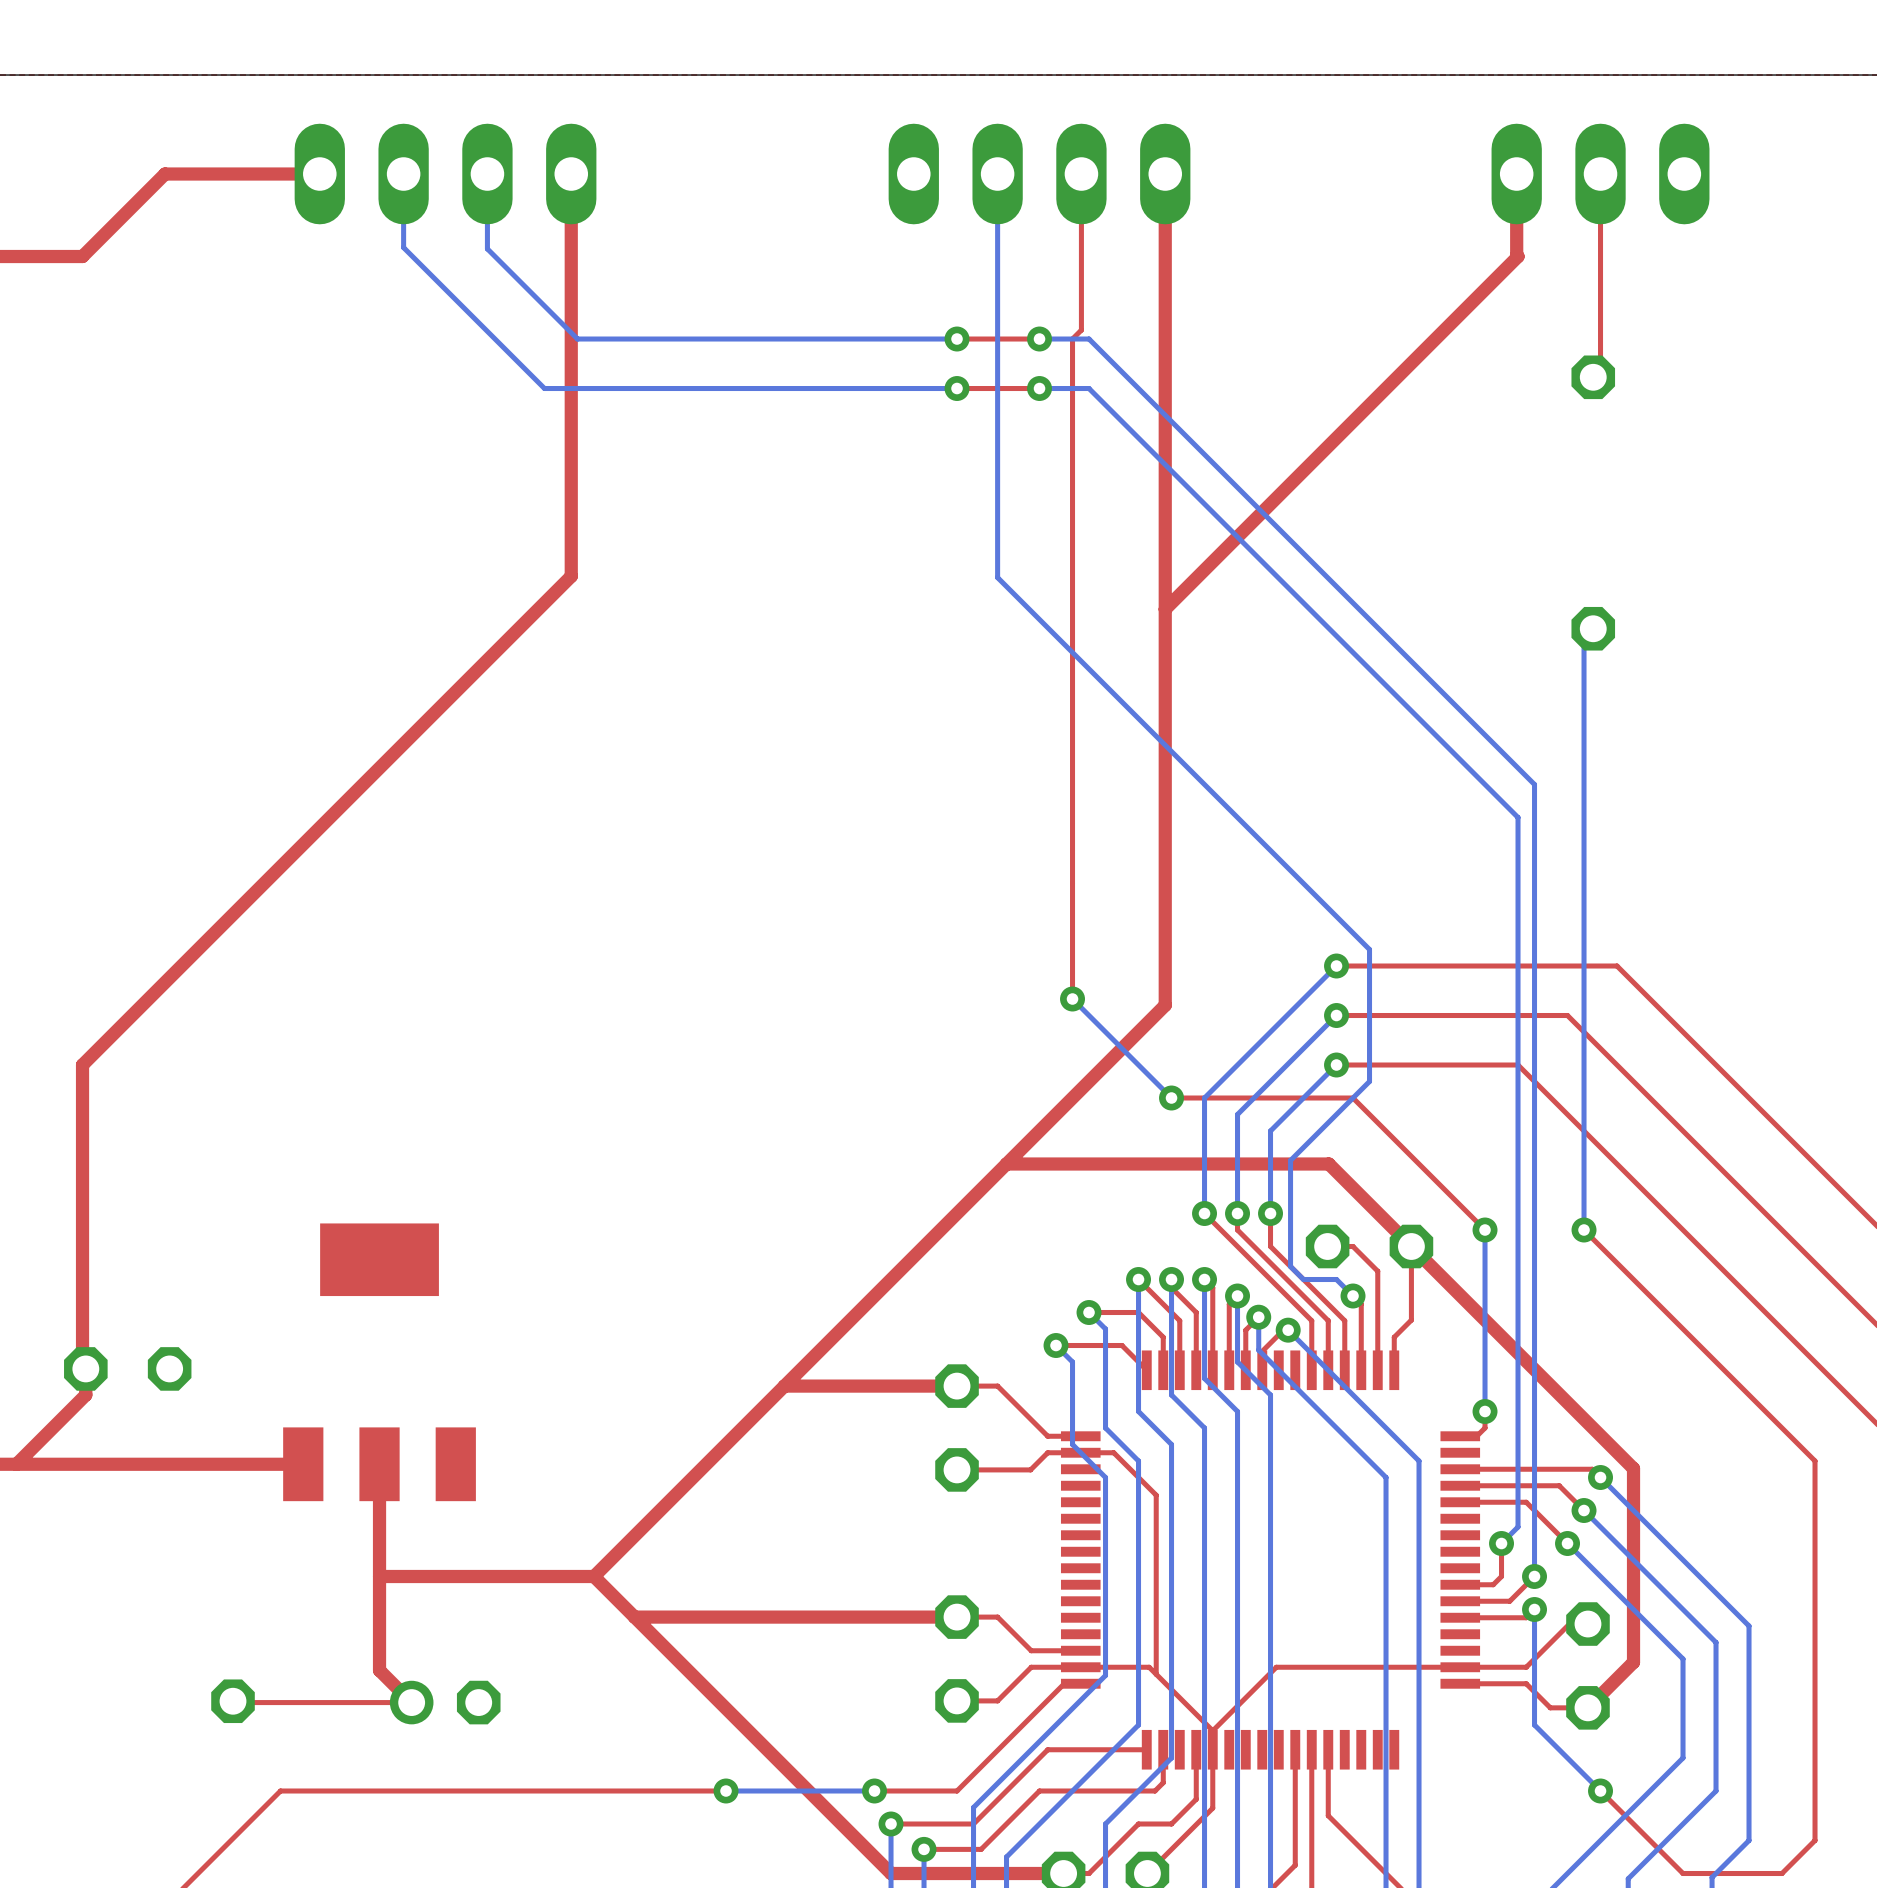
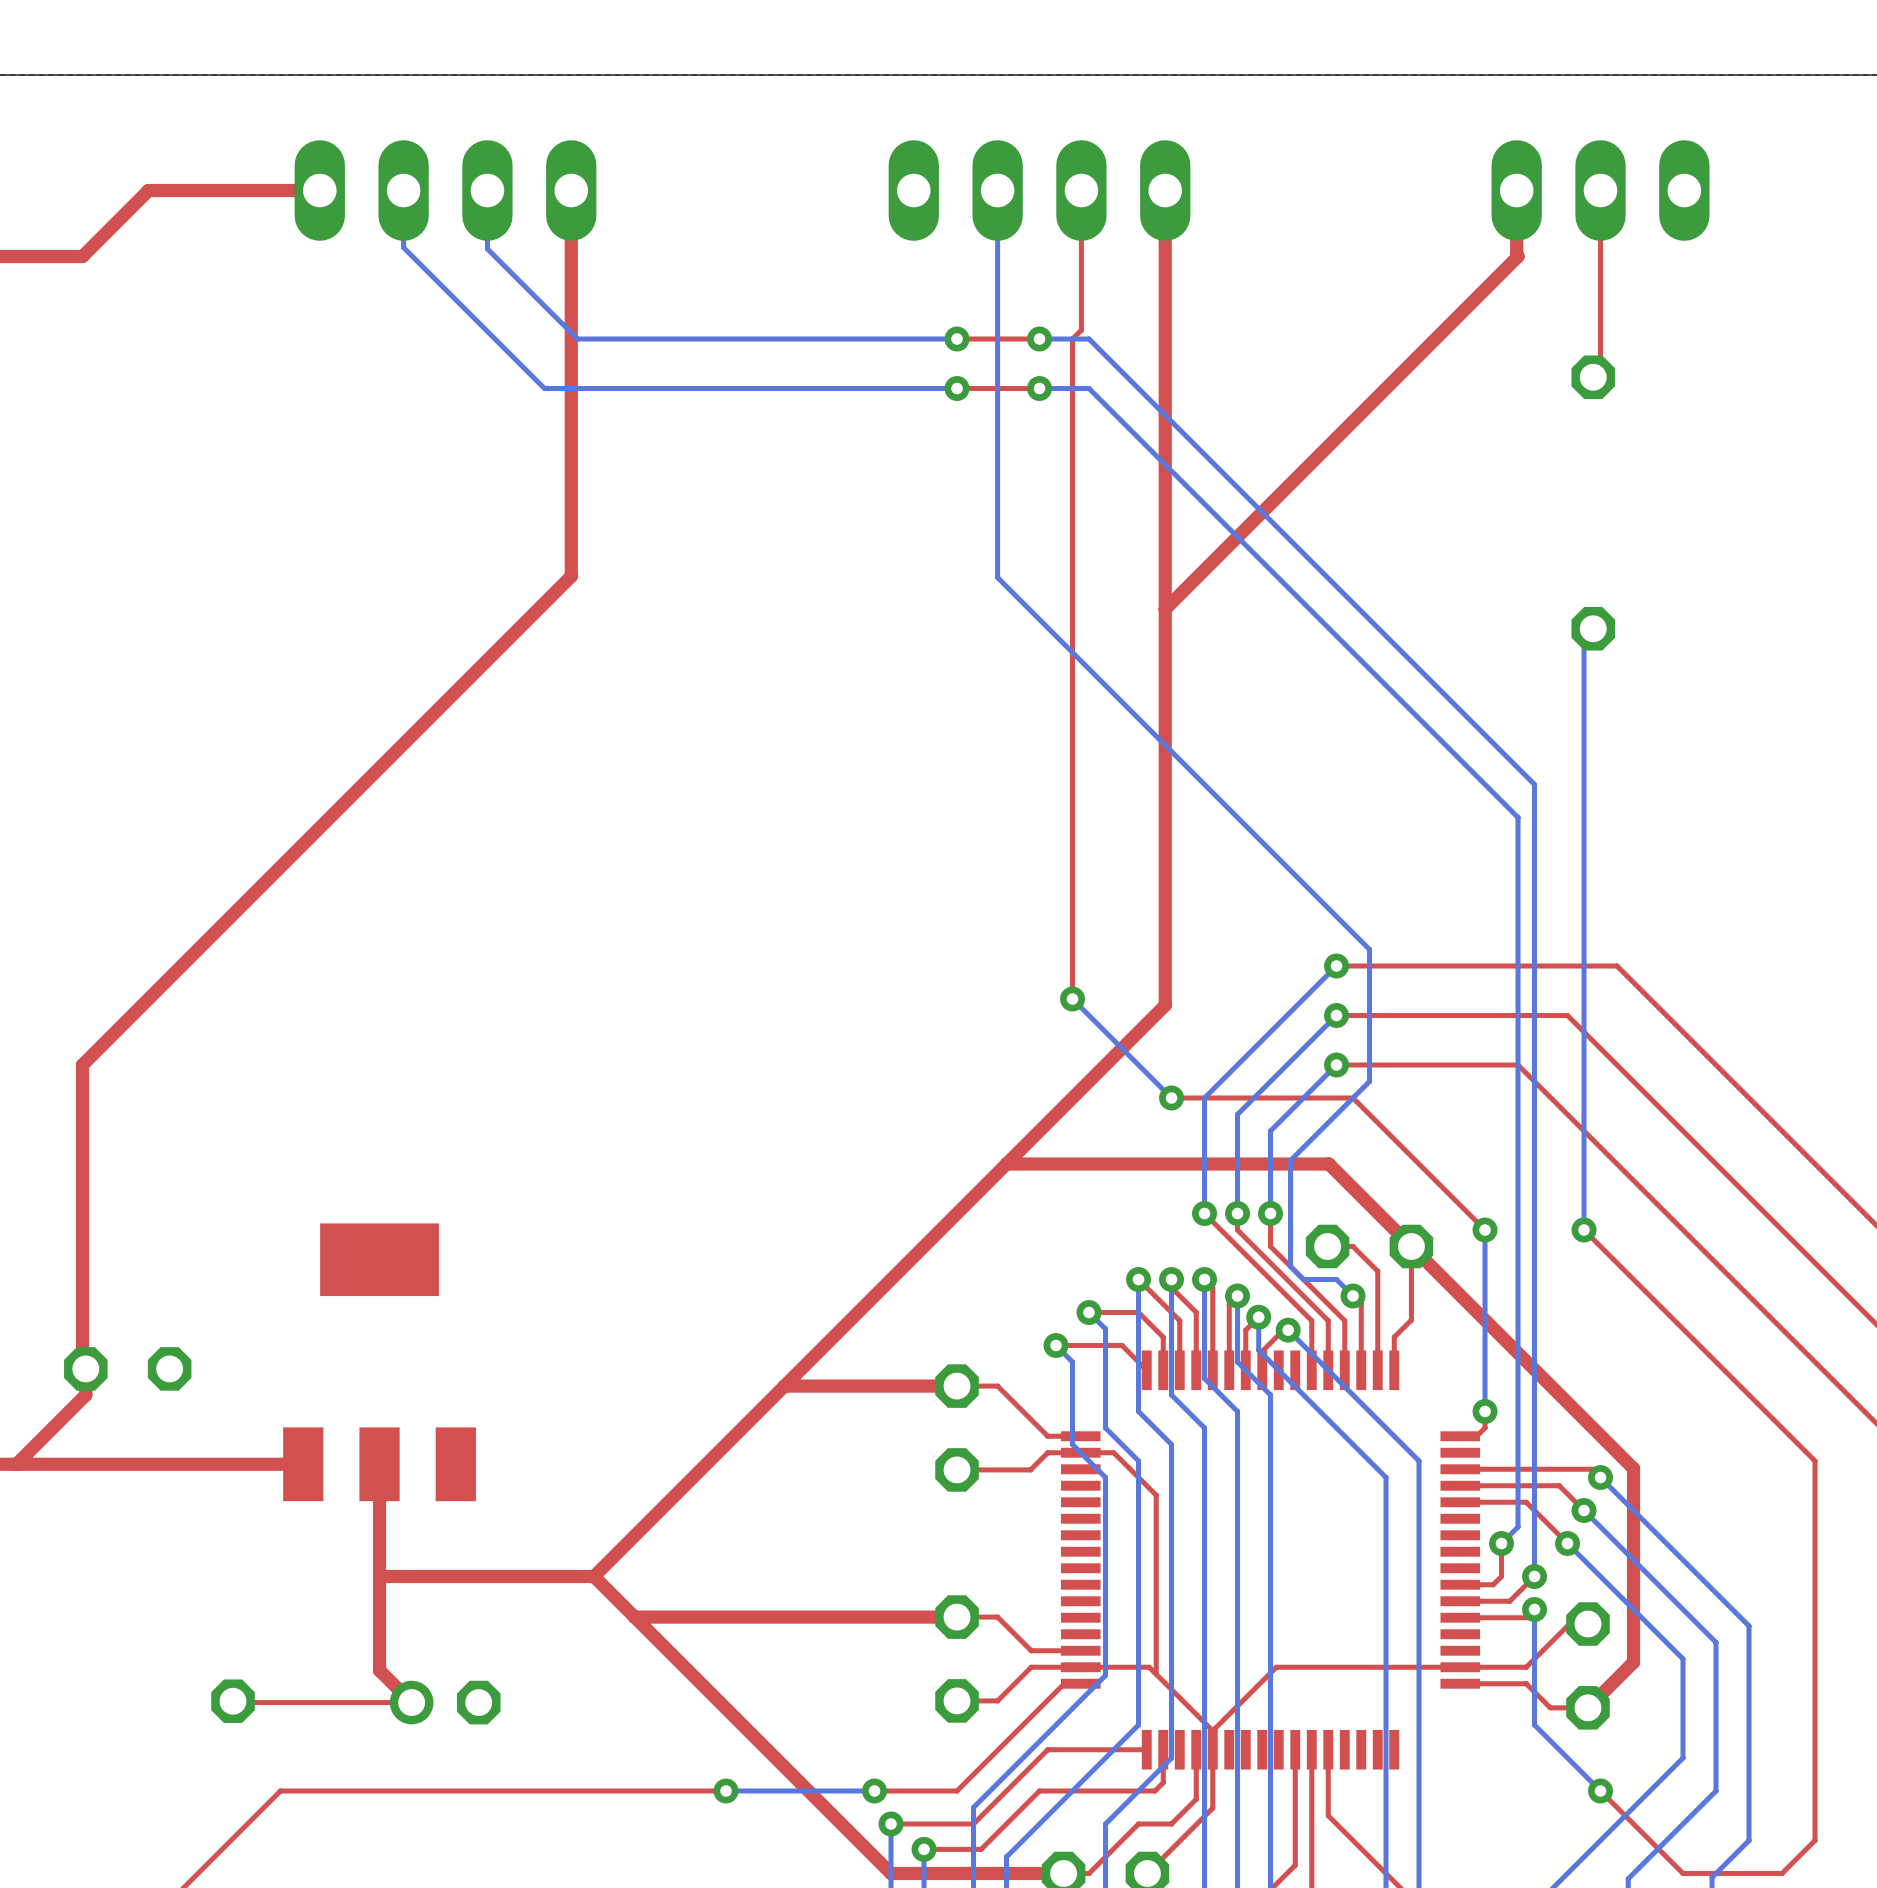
top track: (319, 174) (165, 174) (148, 190) -> (319, 190) (148, 190)
part position: (445, 174) -> (445, 190)
part position: (1039, 174) -> (1039, 190)
part position: (1600, 174) -> (1600, 190)

